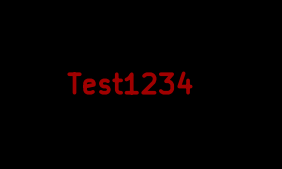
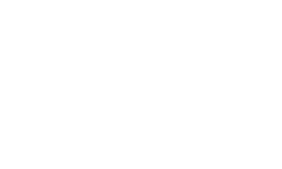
text: Test1234 (129, 83) -> none

